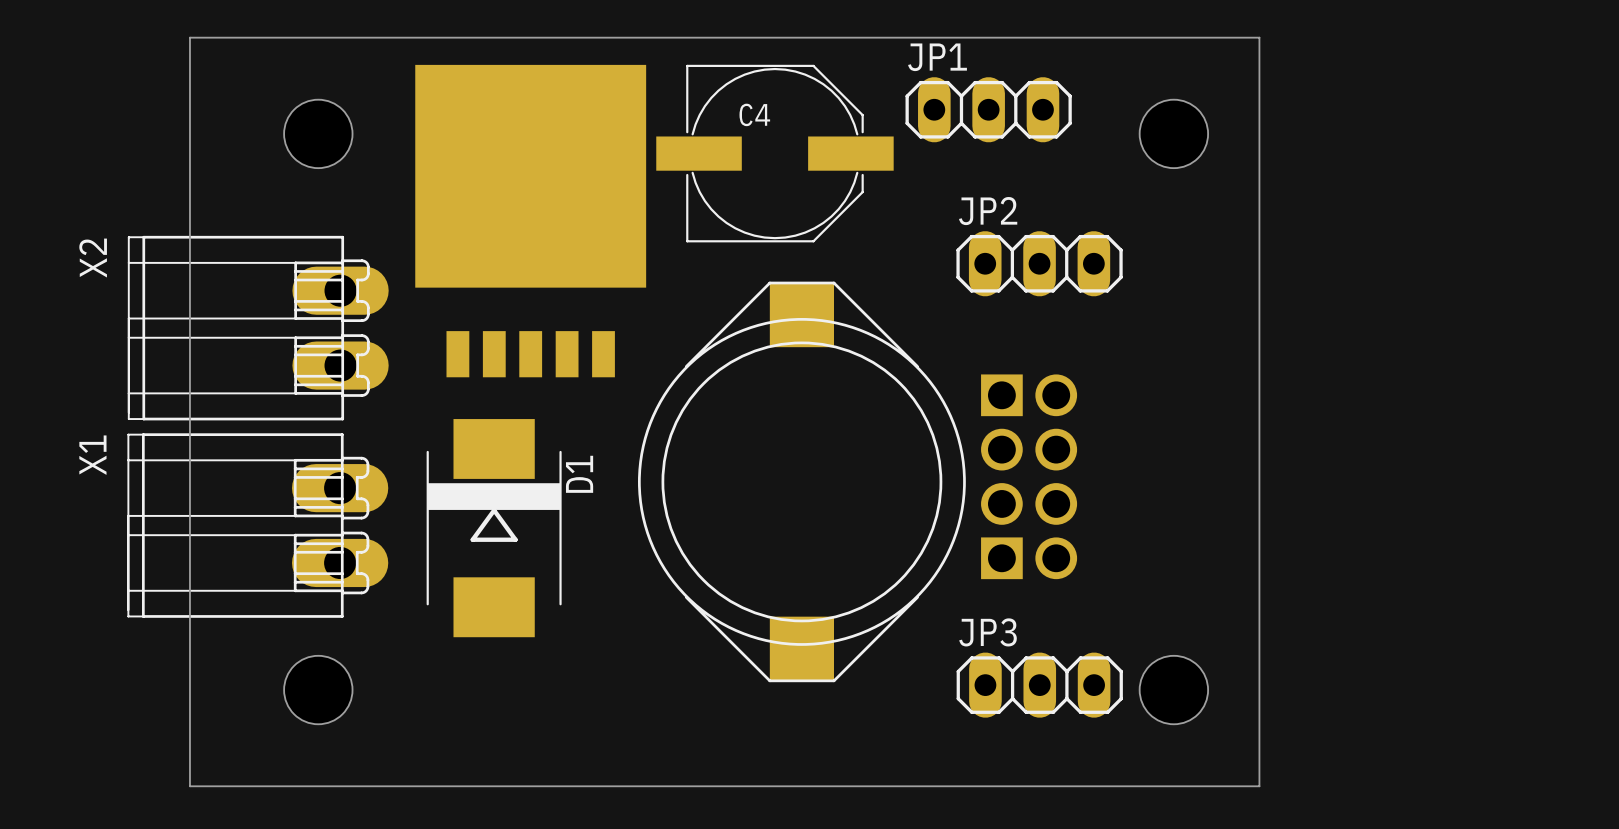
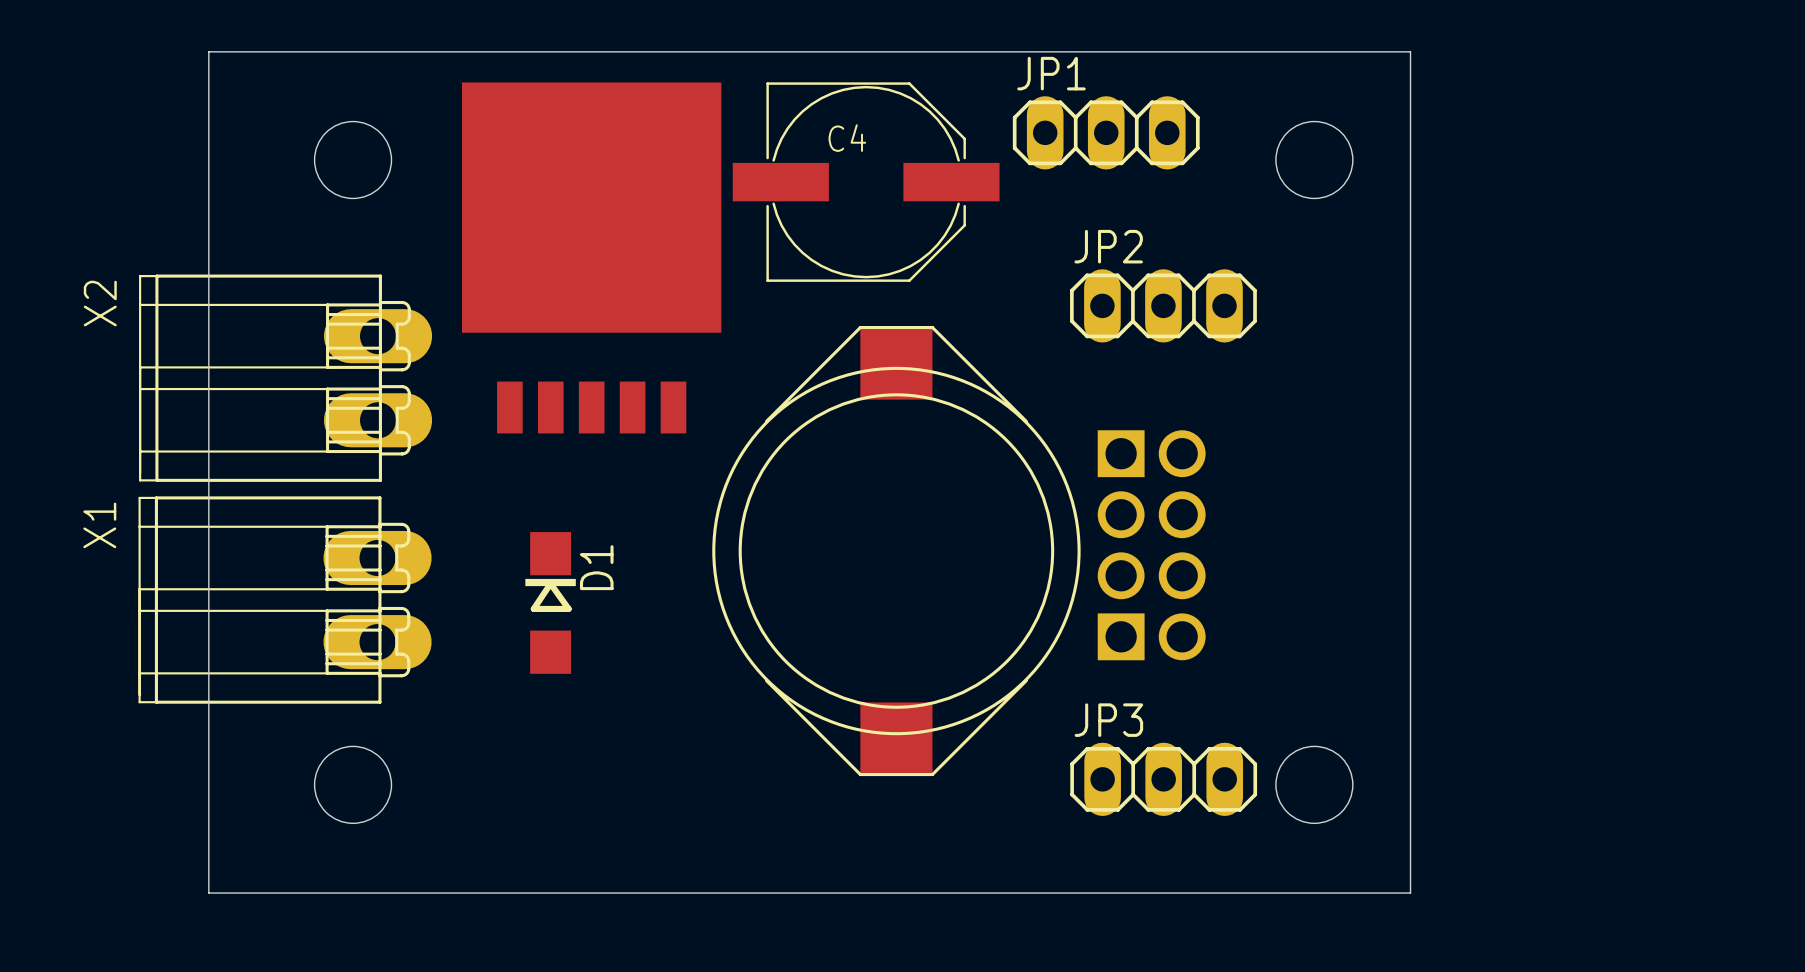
D1 footprint: [426, 419, 562, 638] -> [525, 532, 576, 674]
D1 name position: D1 (579, 474) -> D1 (596, 567)

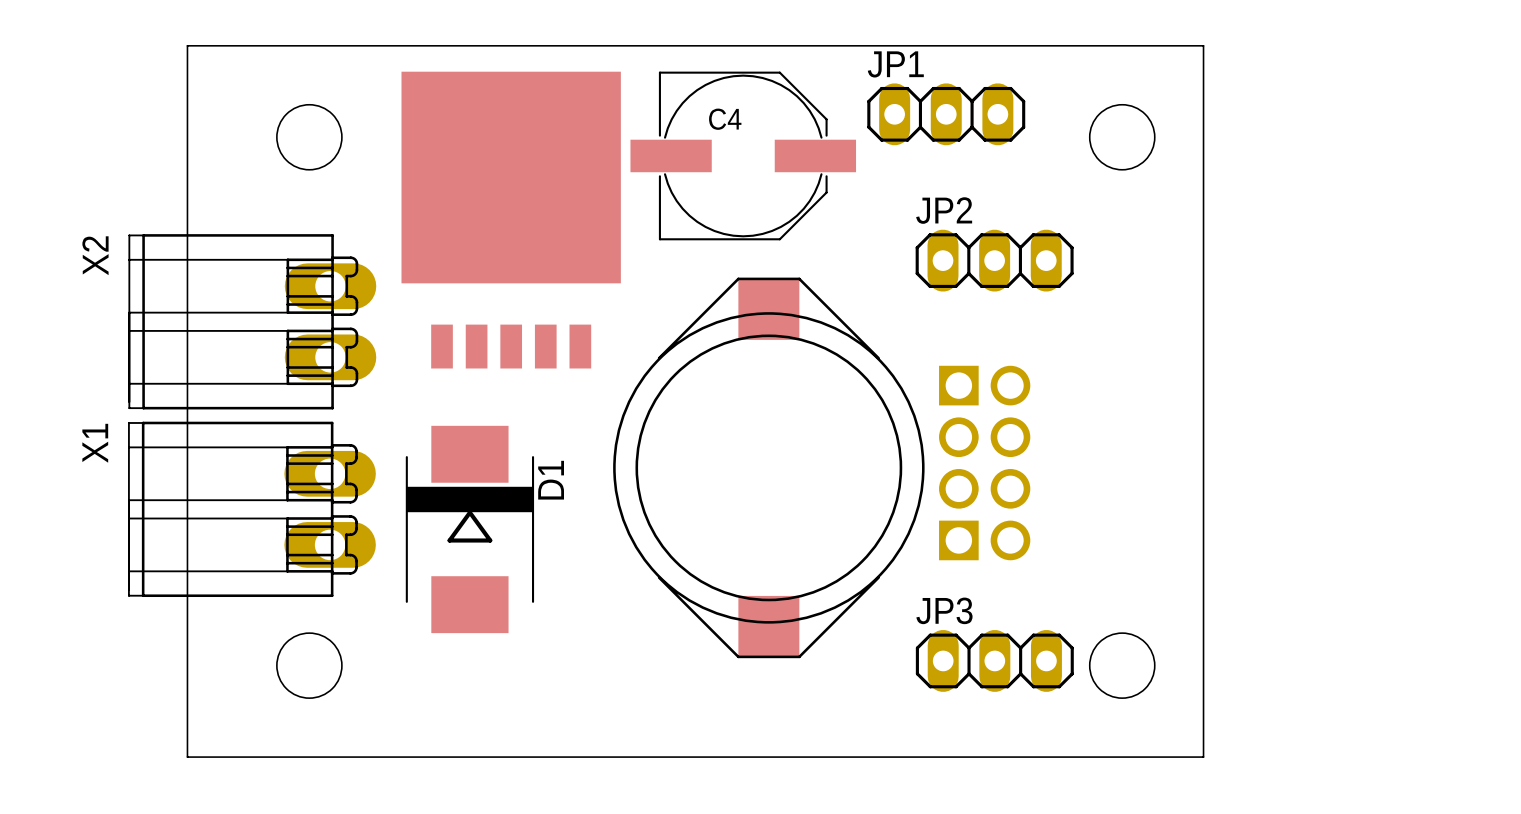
D1 footprint: [525, 532, 576, 674] -> [405, 425, 535, 634]
D1 name position: D1 (596, 567) -> D1 (551, 480)

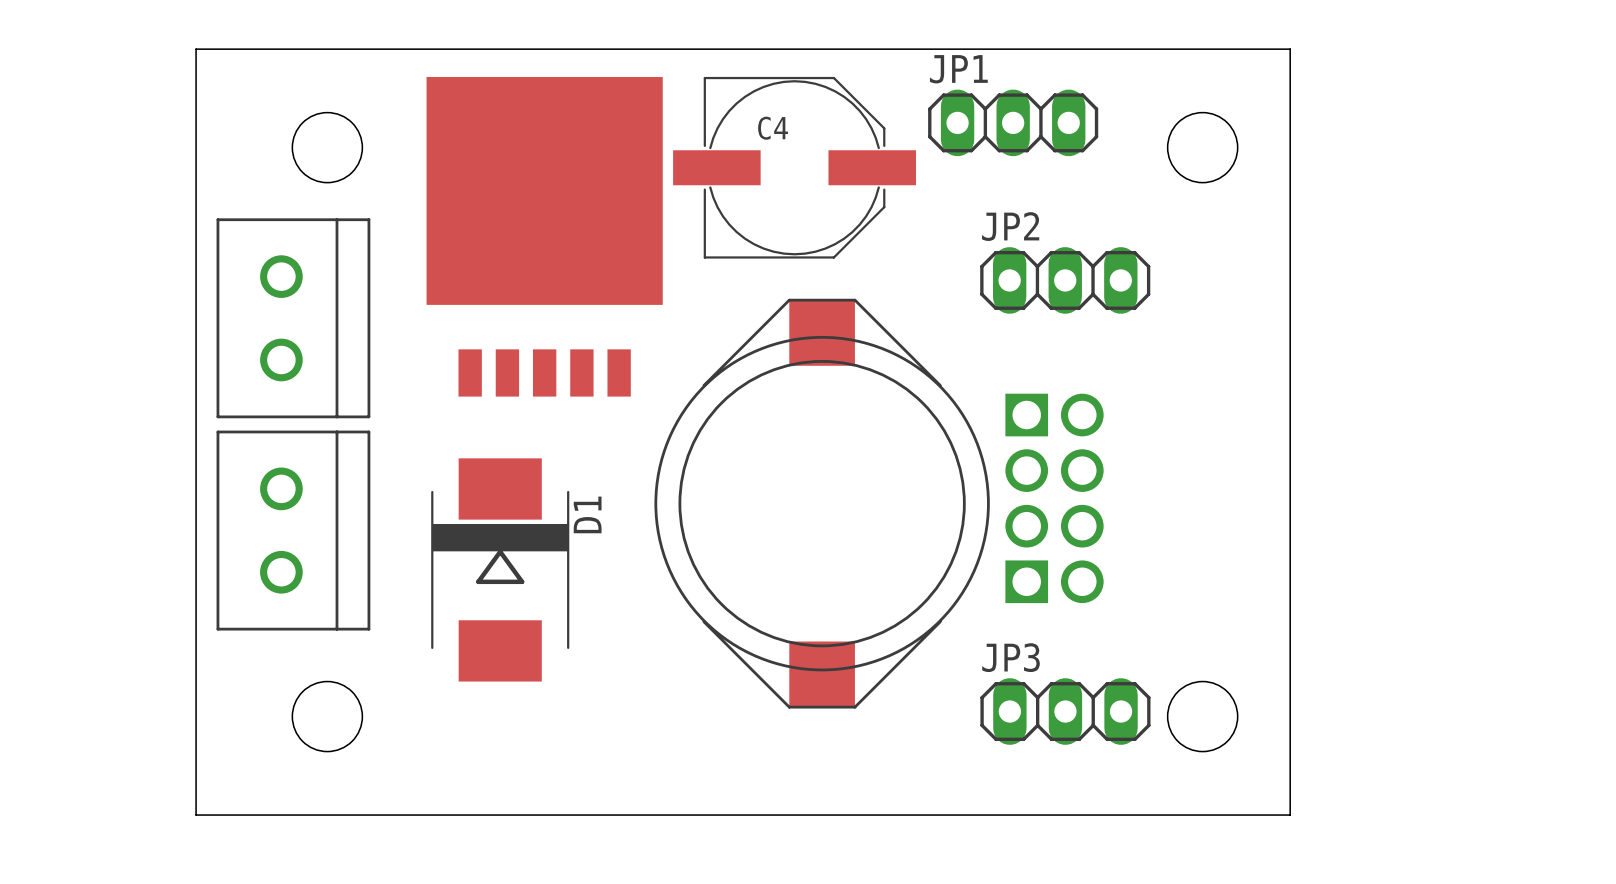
part: none -> (293, 318)
X2: (252, 321) -> none
part: none -> (293, 530)
X1: (251, 509) -> none

